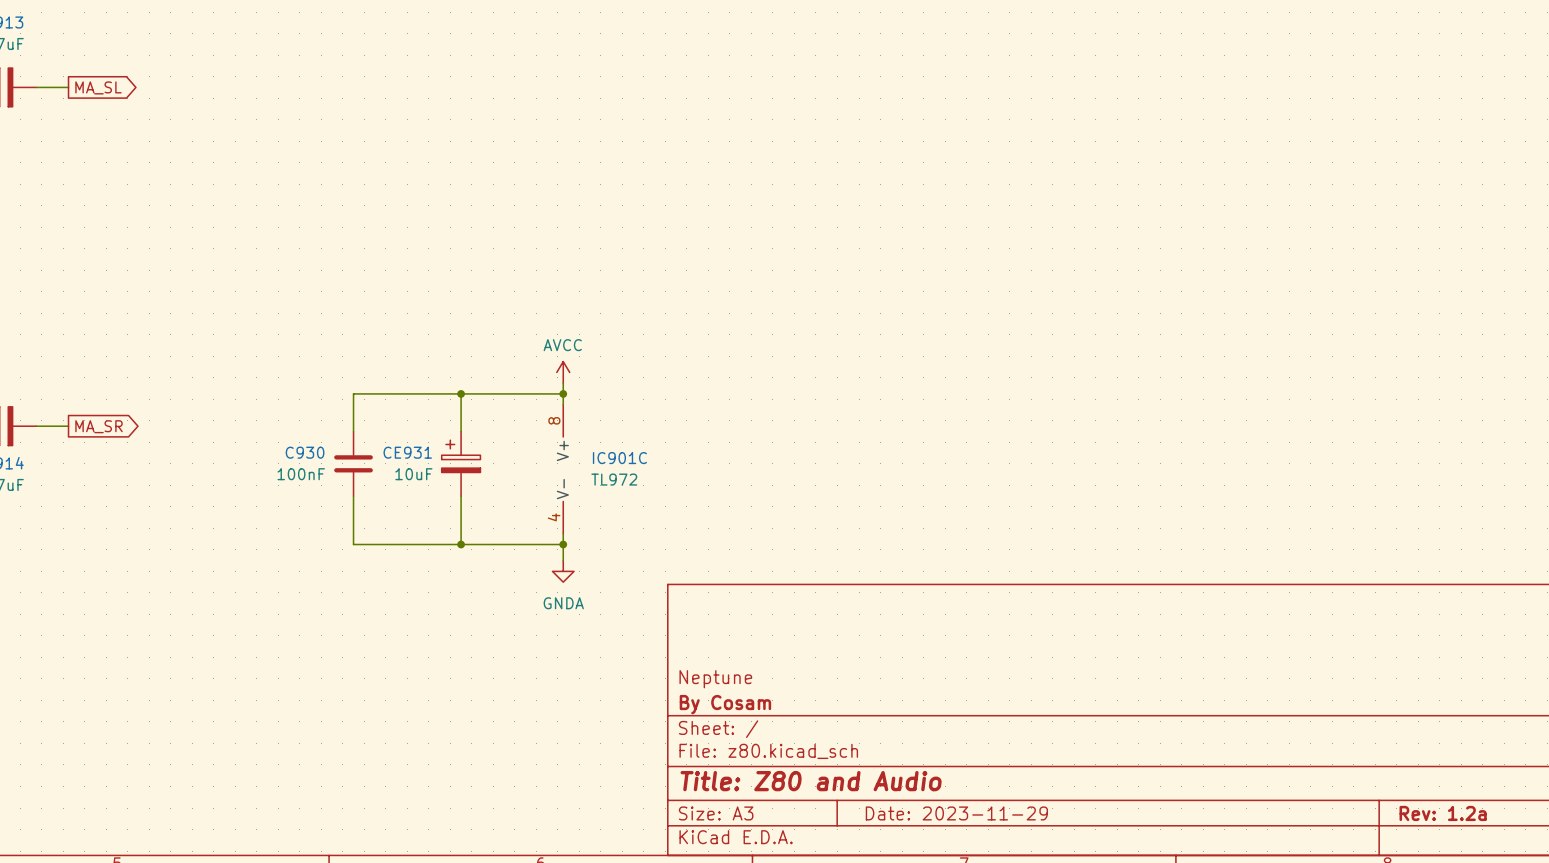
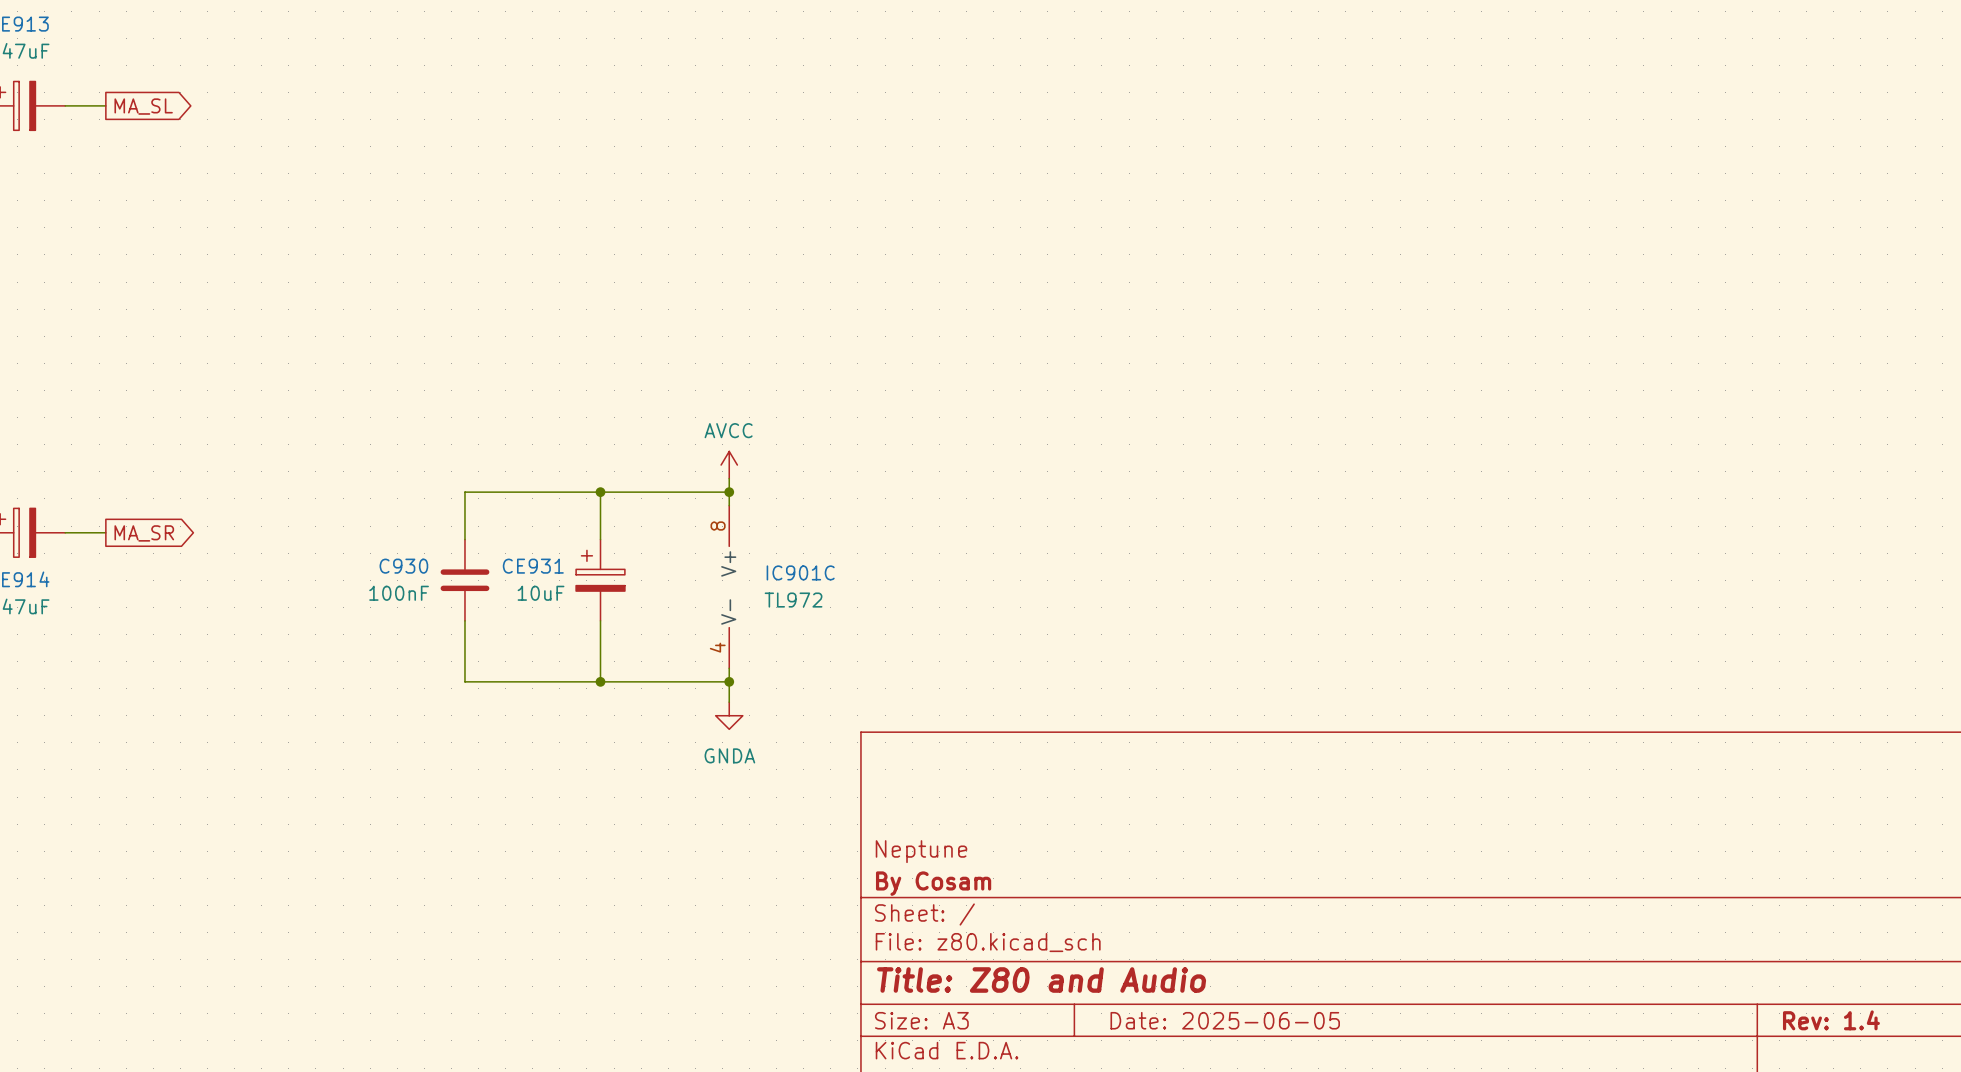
title block: Date: 2023-11-29 (956, 813) -> Date: 2025-06-05 (1225, 1020)
title block: Rev: 1.2a (1443, 813) -> Rev: 1.4 (1831, 1020)

